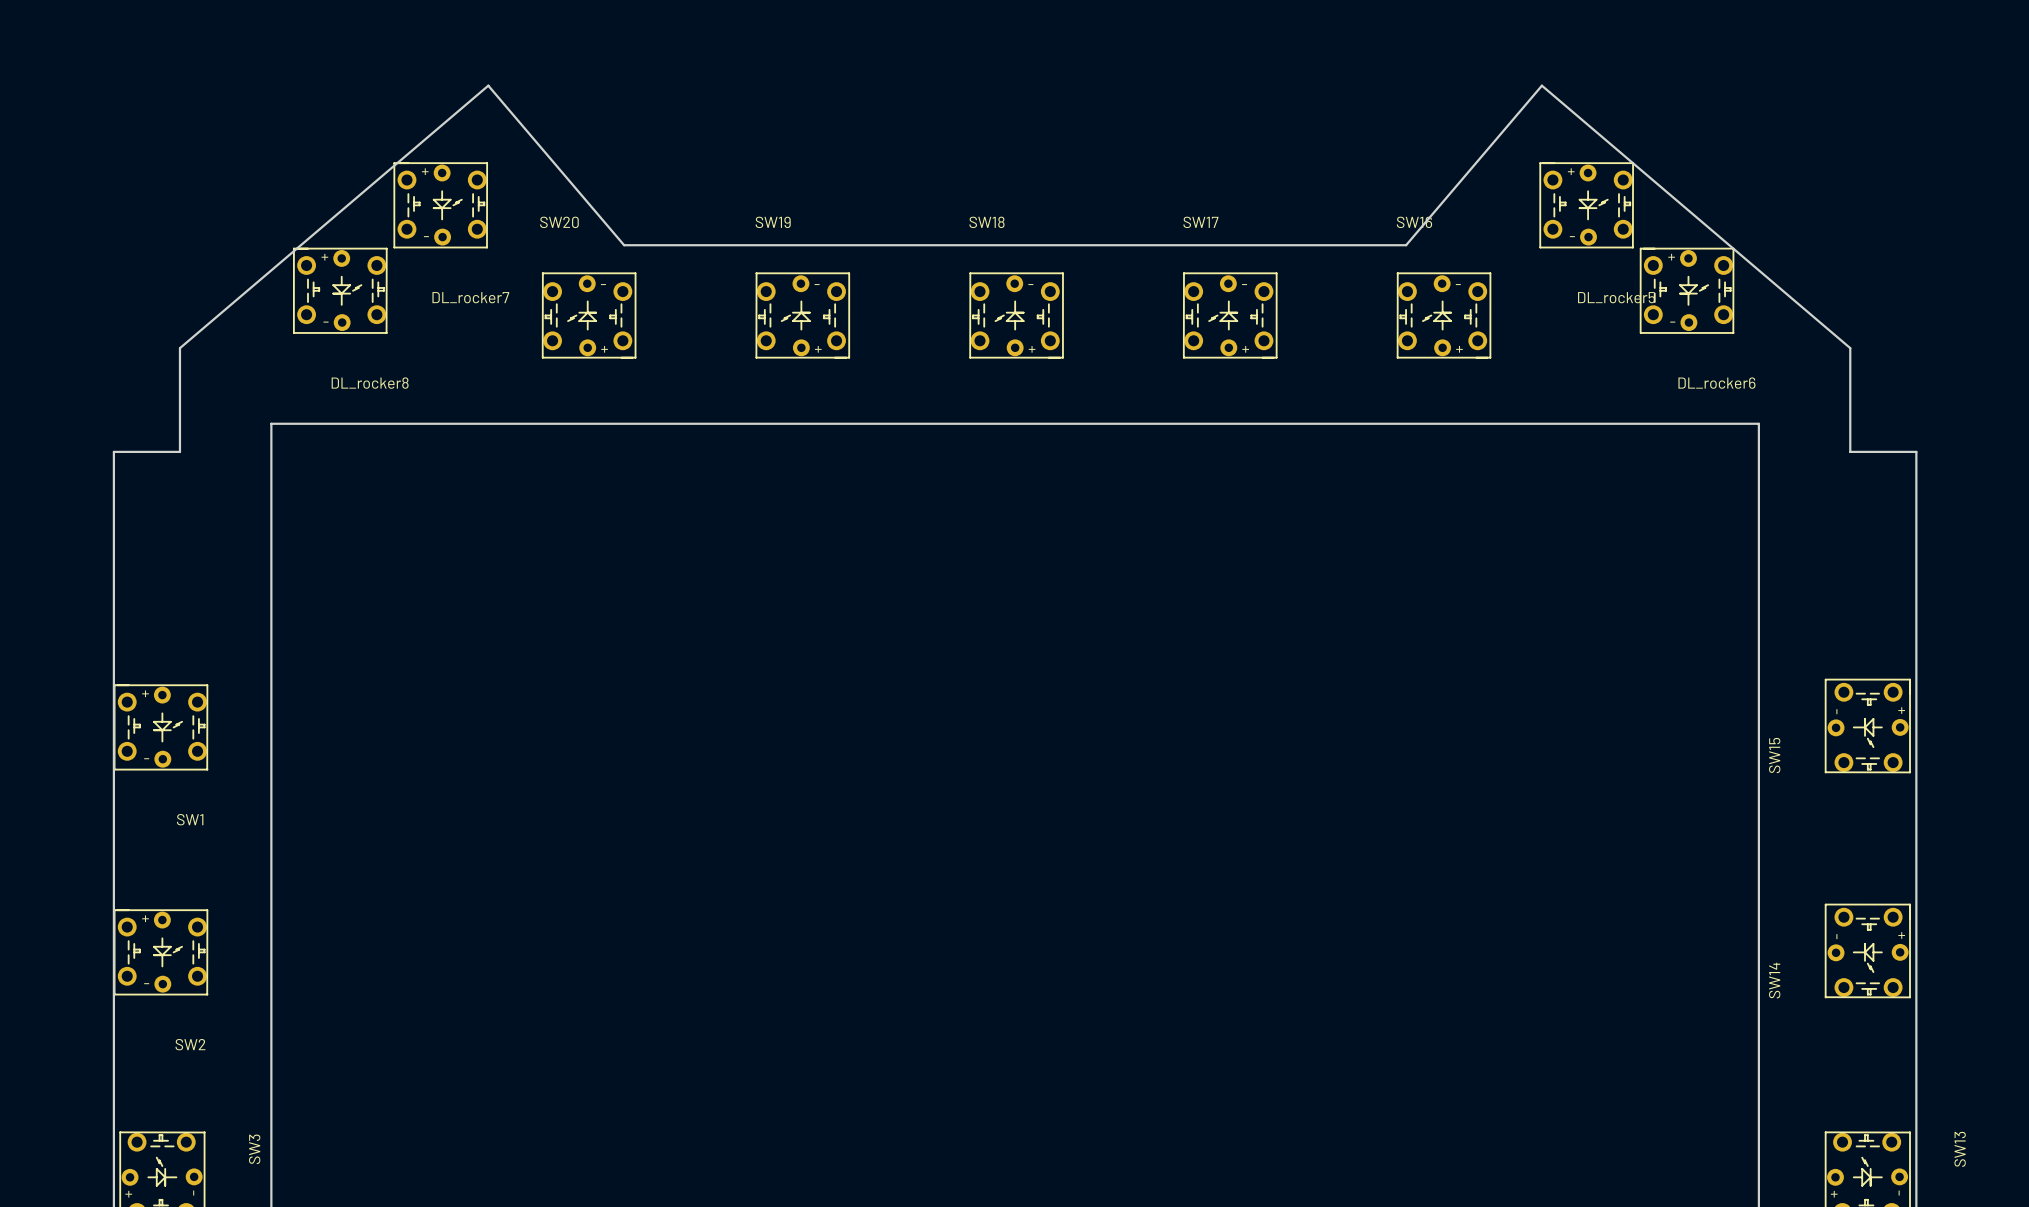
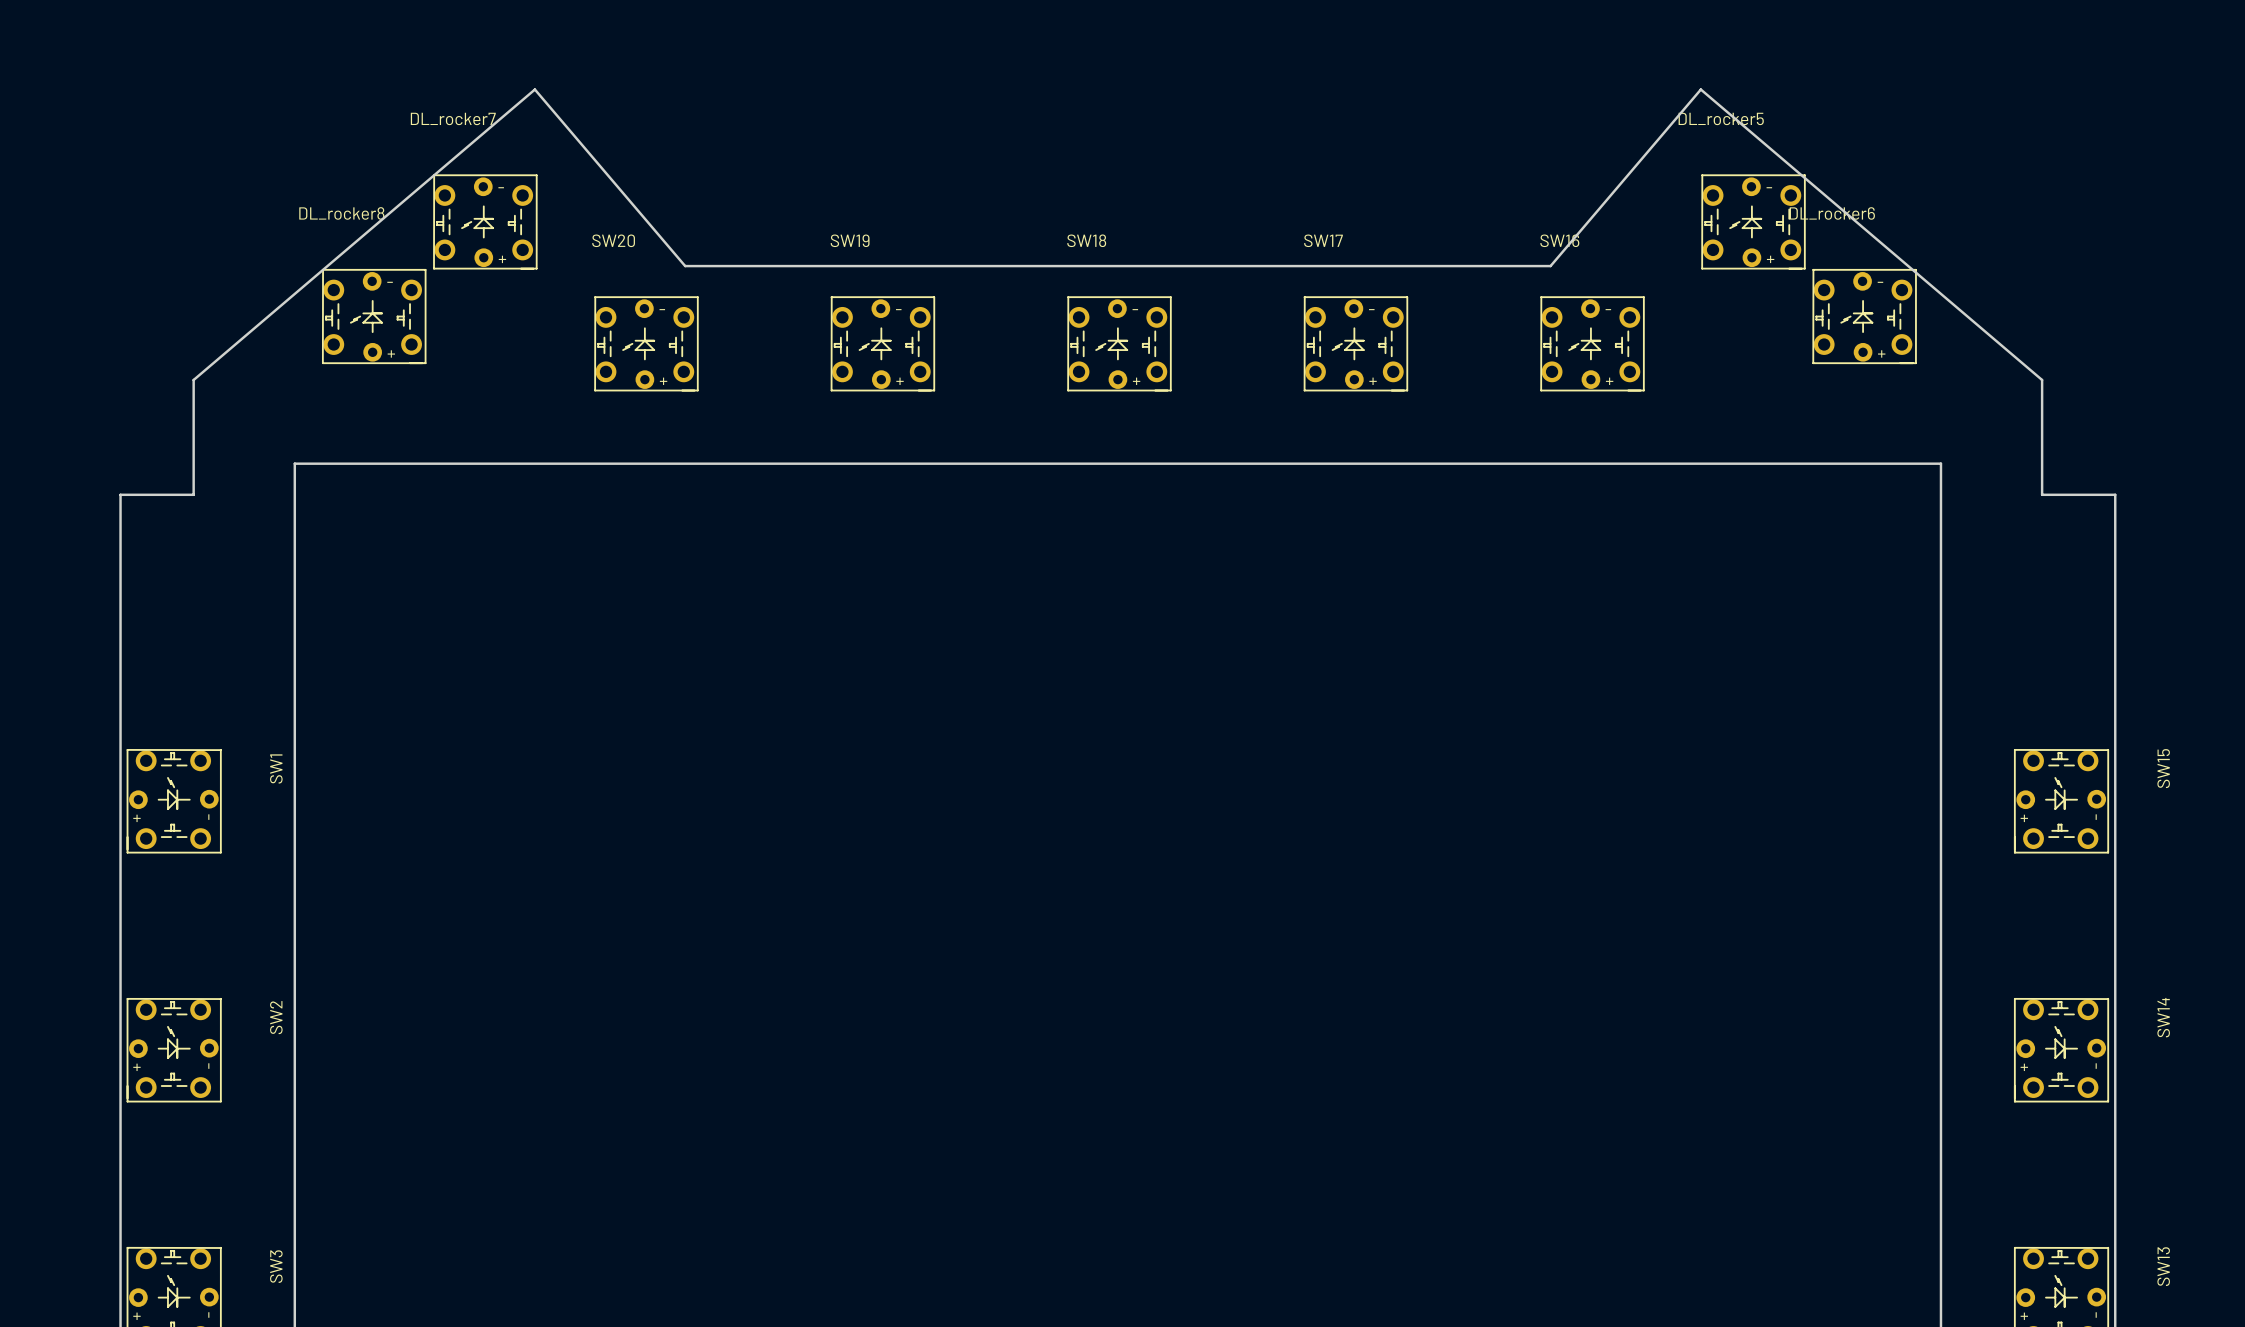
DL_rocker7 rotation: 0° (440, 205) -> 180° (485, 221)
DL_rocker5 rotation: 0° (1586, 205) -> 180° (1753, 221)
DL_rocker8 rotation: 0° (340, 290) -> 180° (374, 316)
DL_rocker6 rotation: 0° (1687, 290) -> 180° (1864, 316)
SW15 rotation: 0° (1867, 726) -> 180° (2061, 801)
SW1 rotation: 0° (161, 727) -> 90° counterclockwise (174, 801)
SW14 rotation: 0° (1867, 950) -> 180° (2061, 1050)
SW2 rotation: 0° (161, 952) -> 90° counterclockwise (174, 1050)

